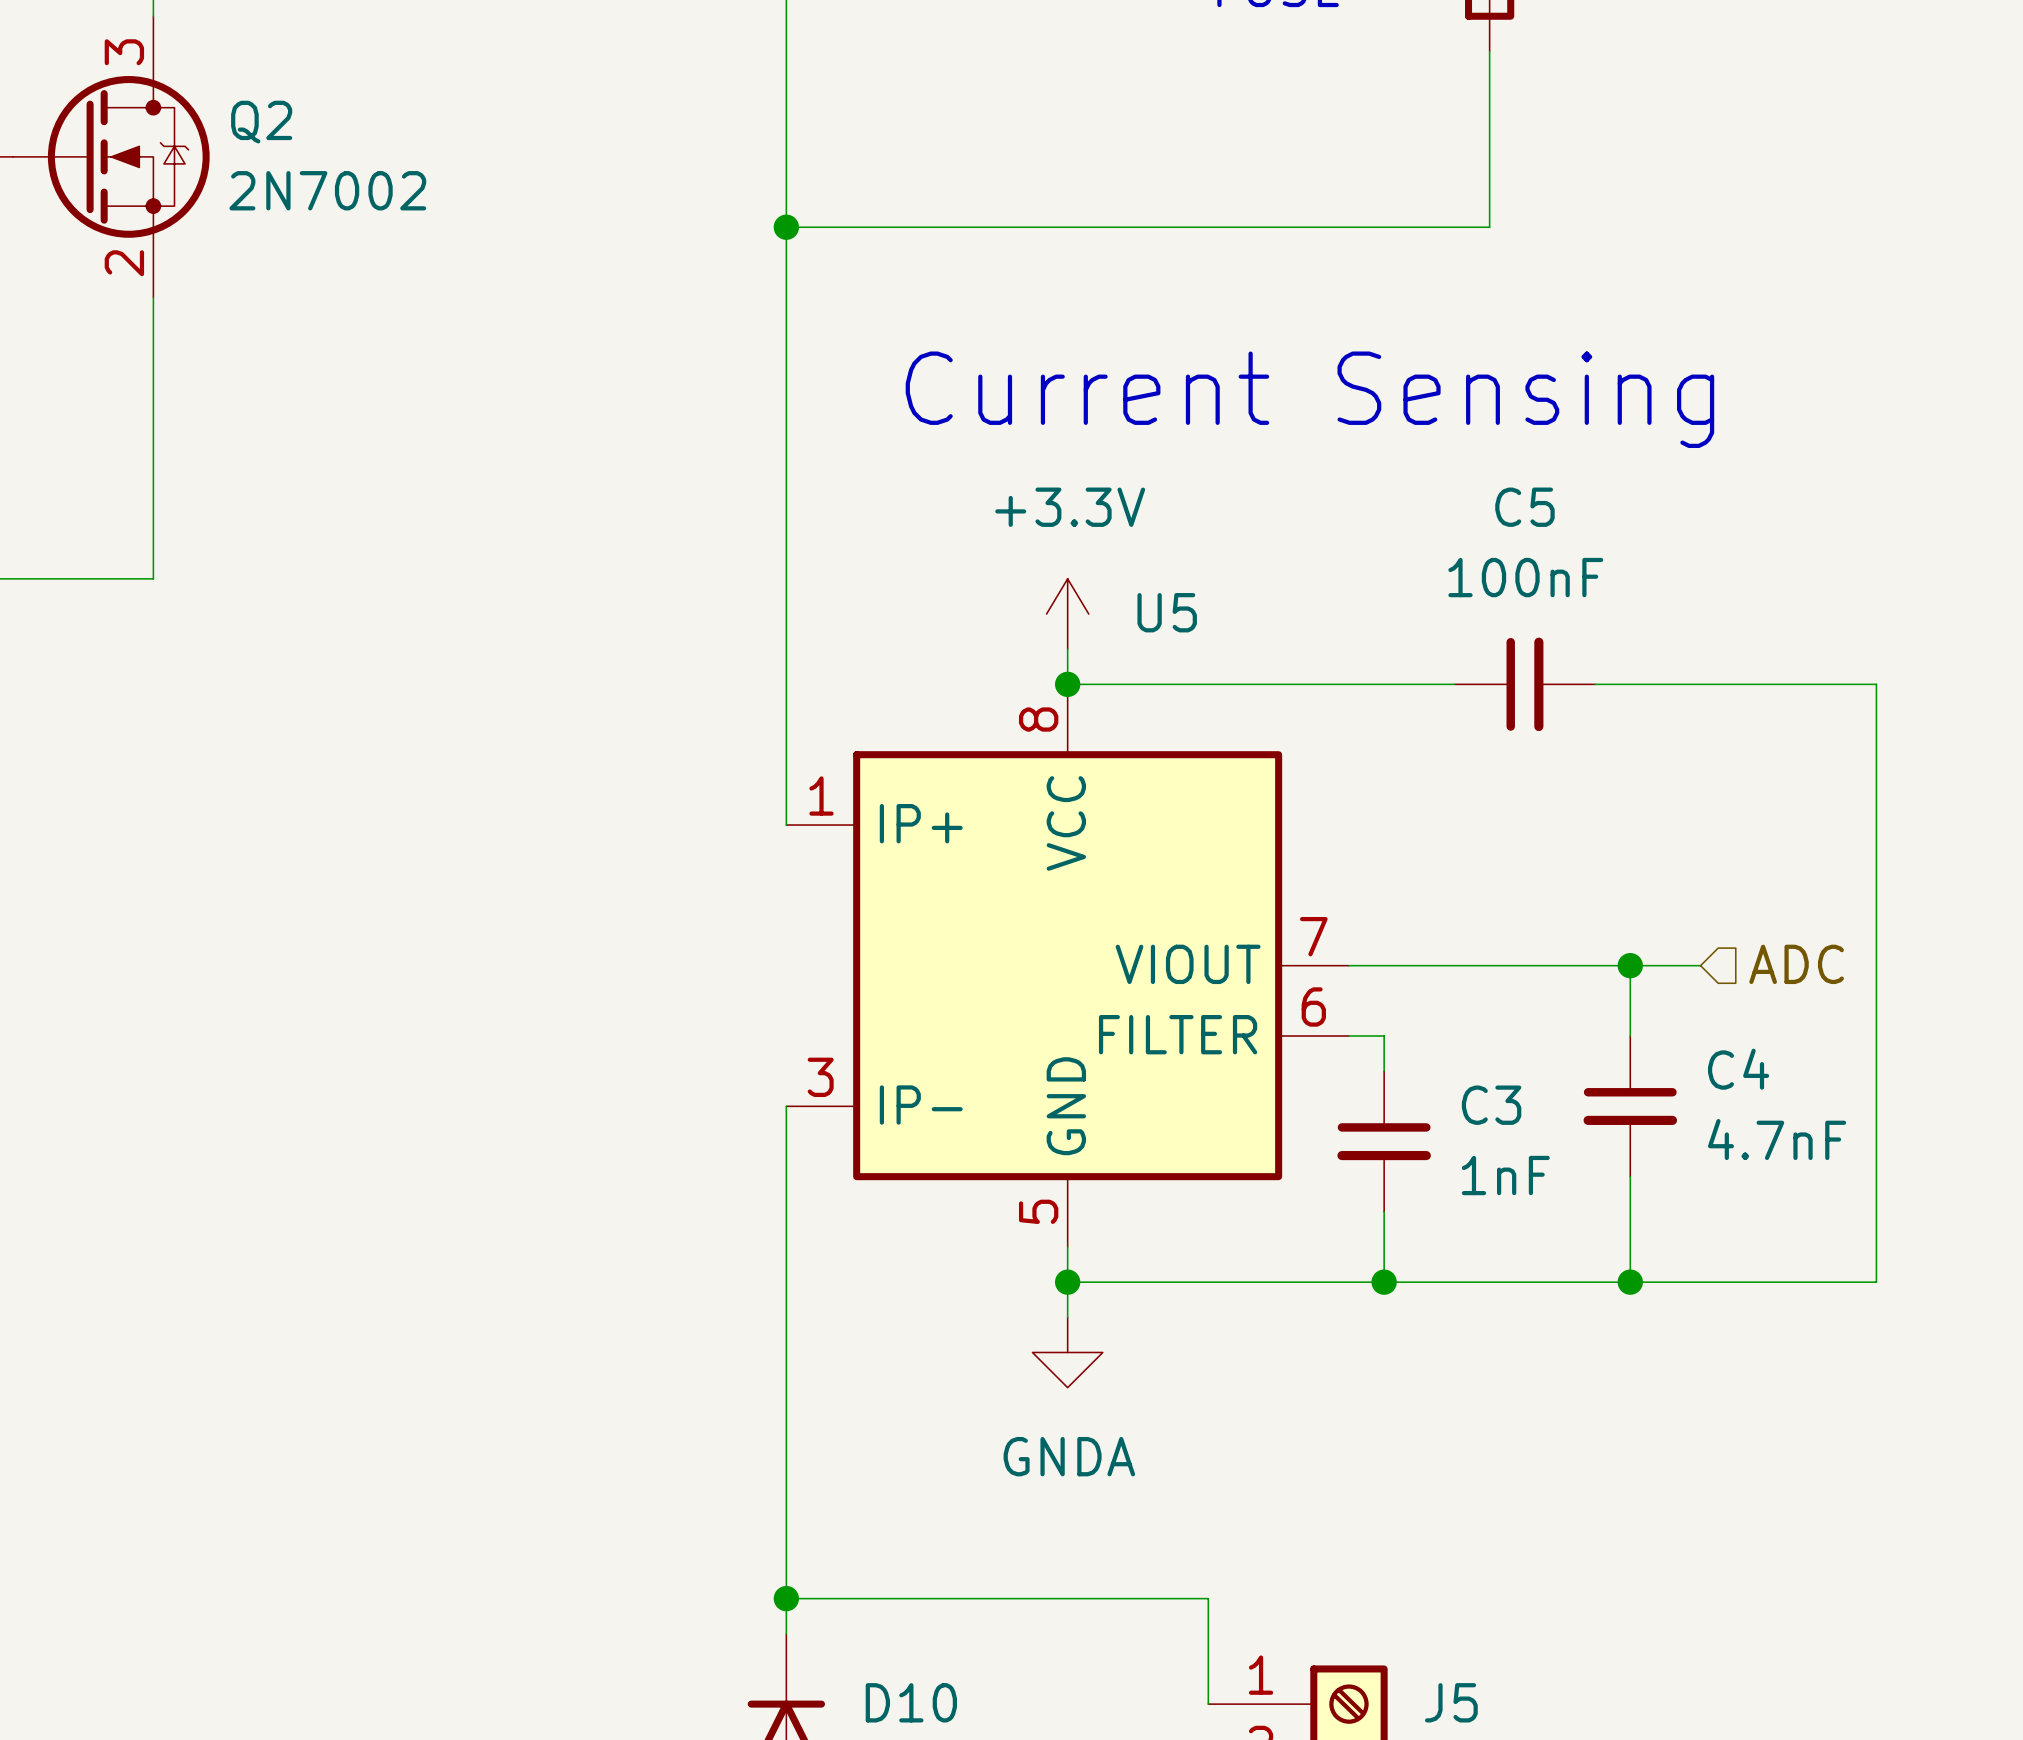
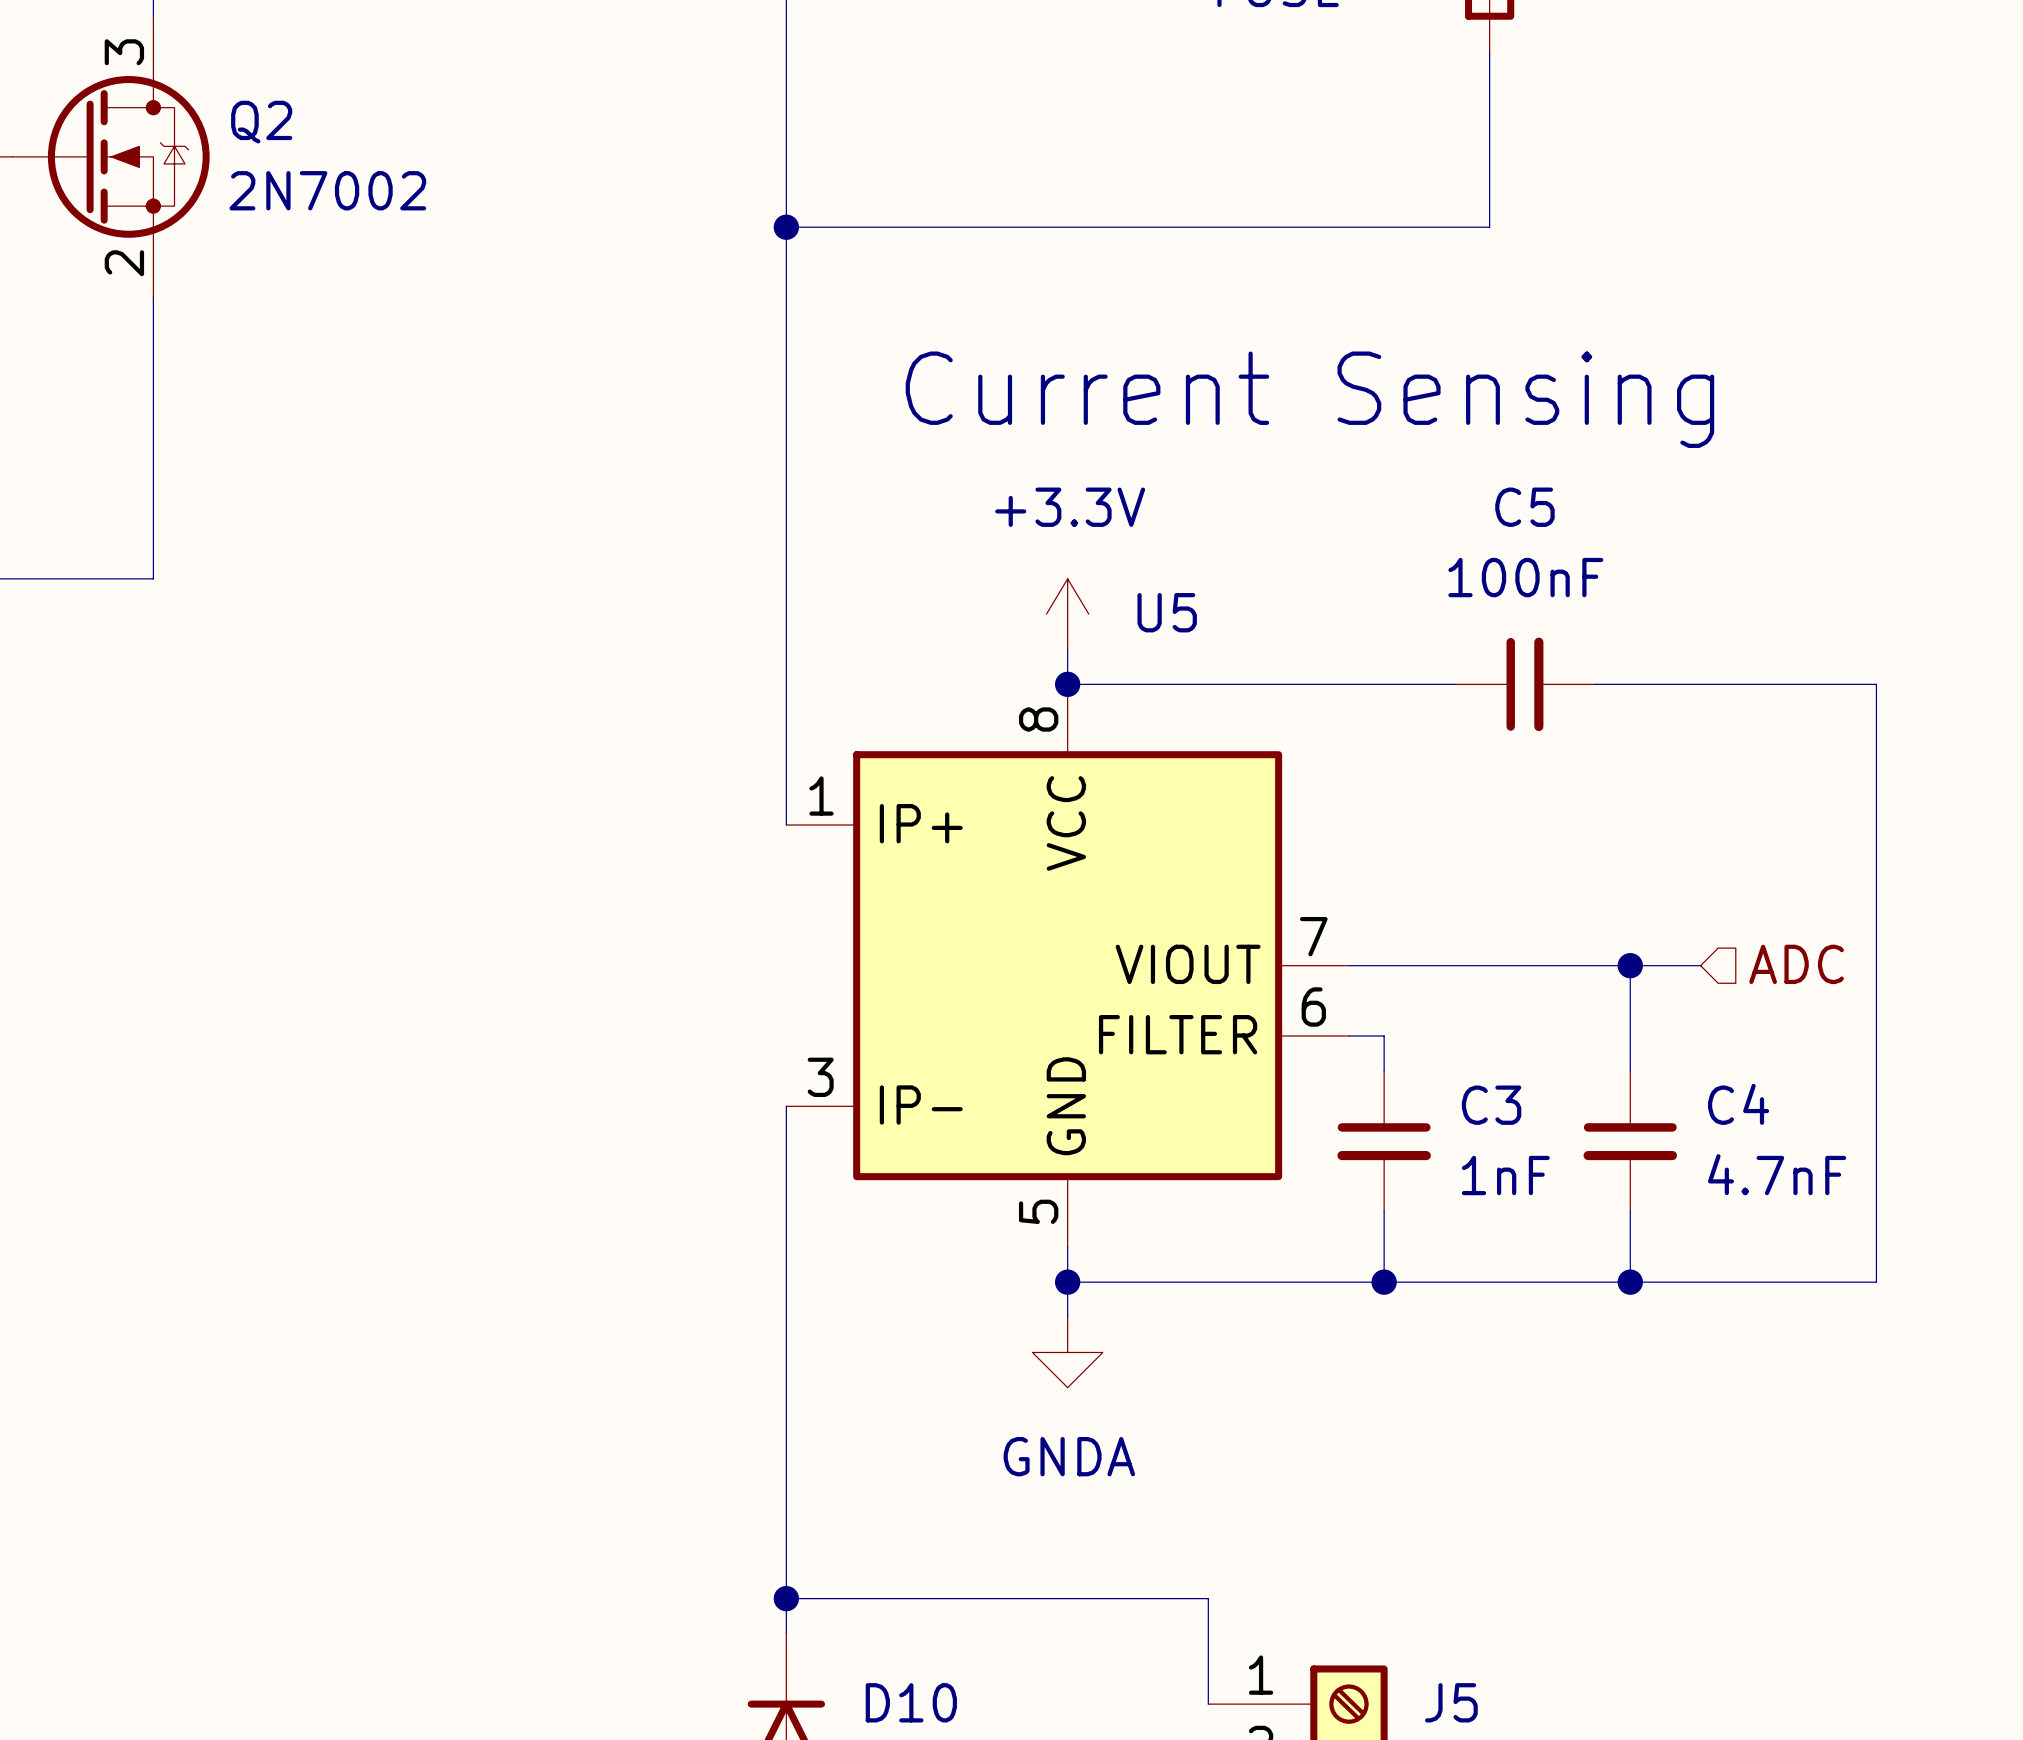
C4 position: (1630, 1106) -> (1630, 1141)

